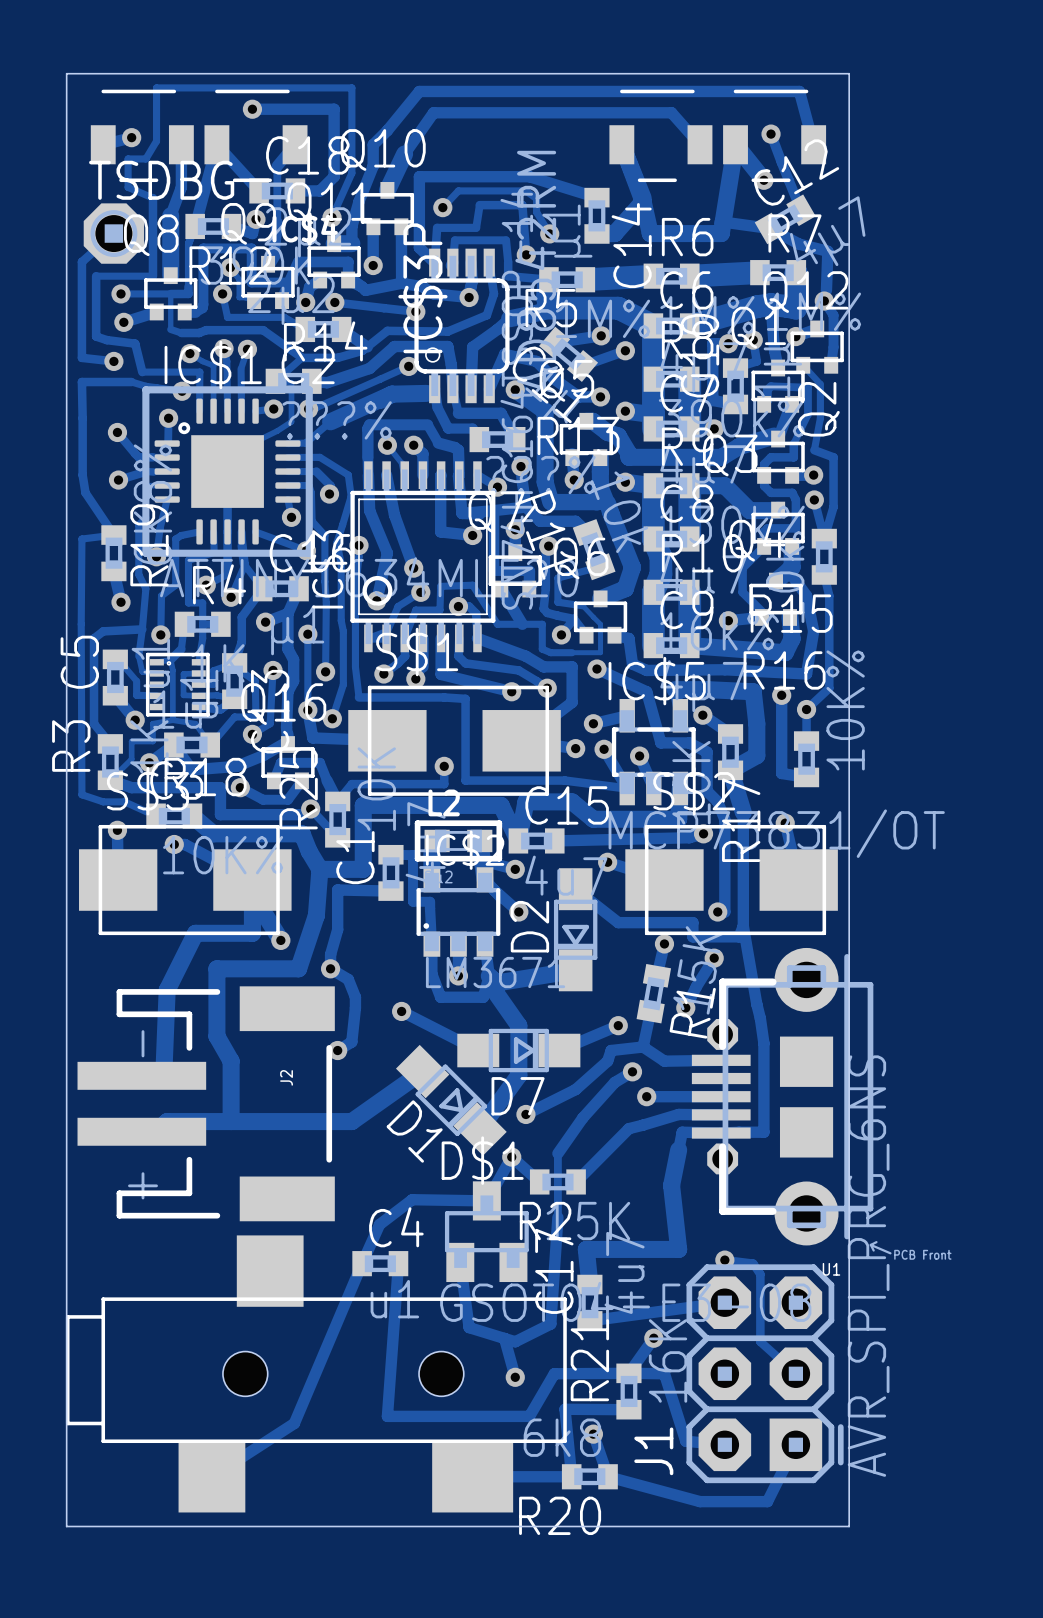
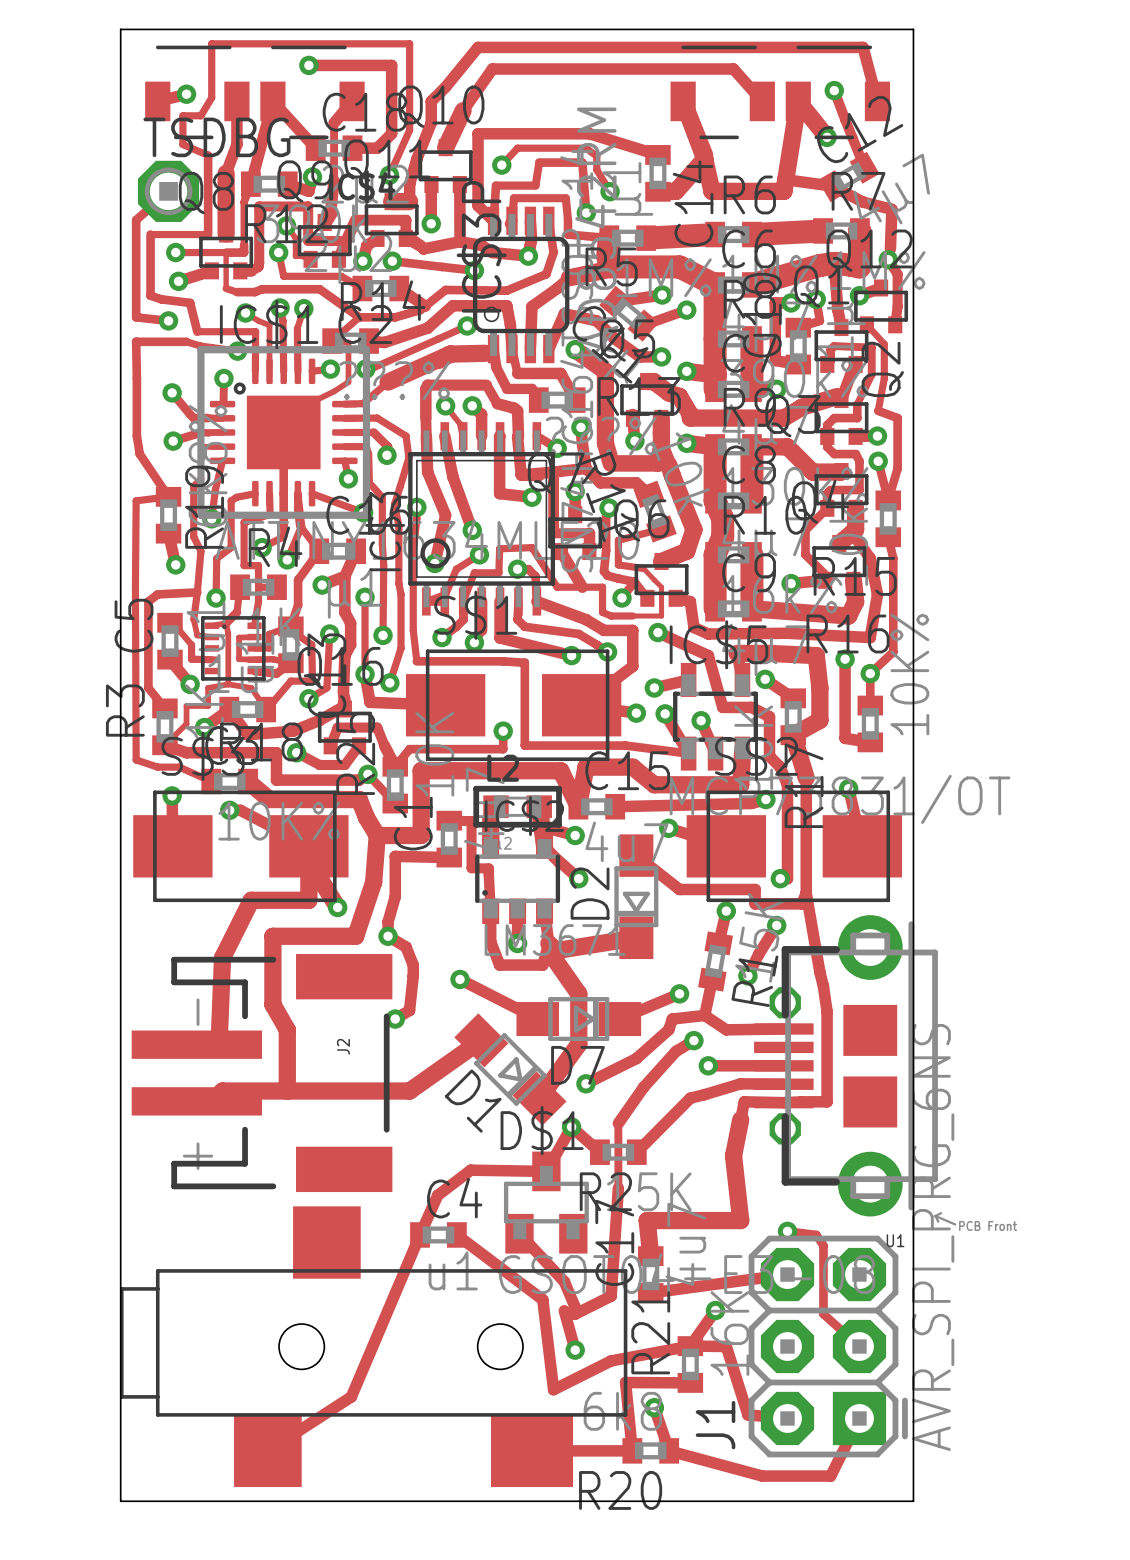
track: (460, 1262) (469, 1327) (515, 1341) -> (519, 1233) (564, 1281) (575, 1307) (575, 1314)
track: (398, 1263) (387, 1416) (529, 1416) (554, 1373) (628, 1373) -> (456, 1234) (542, 1299) (553, 1389) (611, 1360) (690, 1346)

